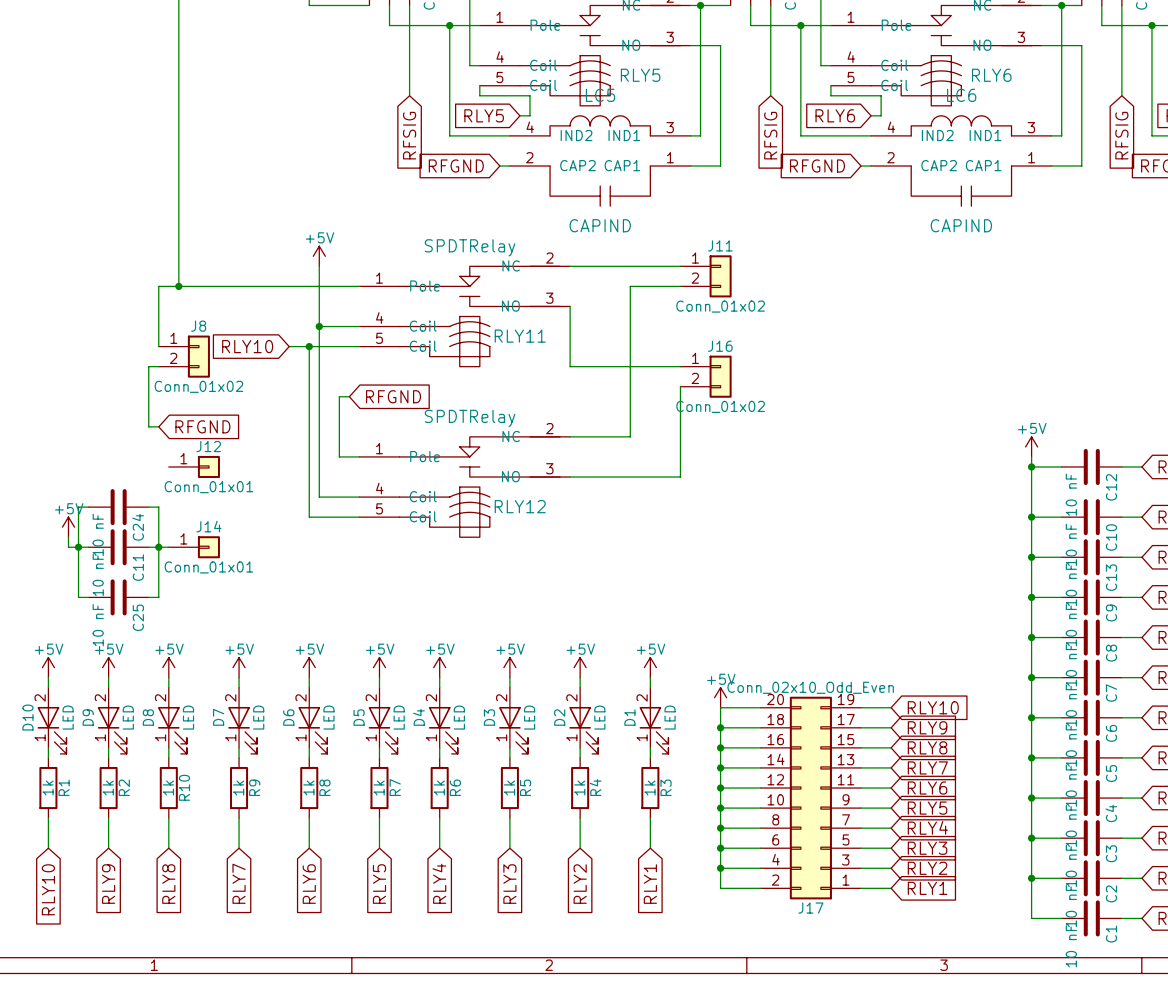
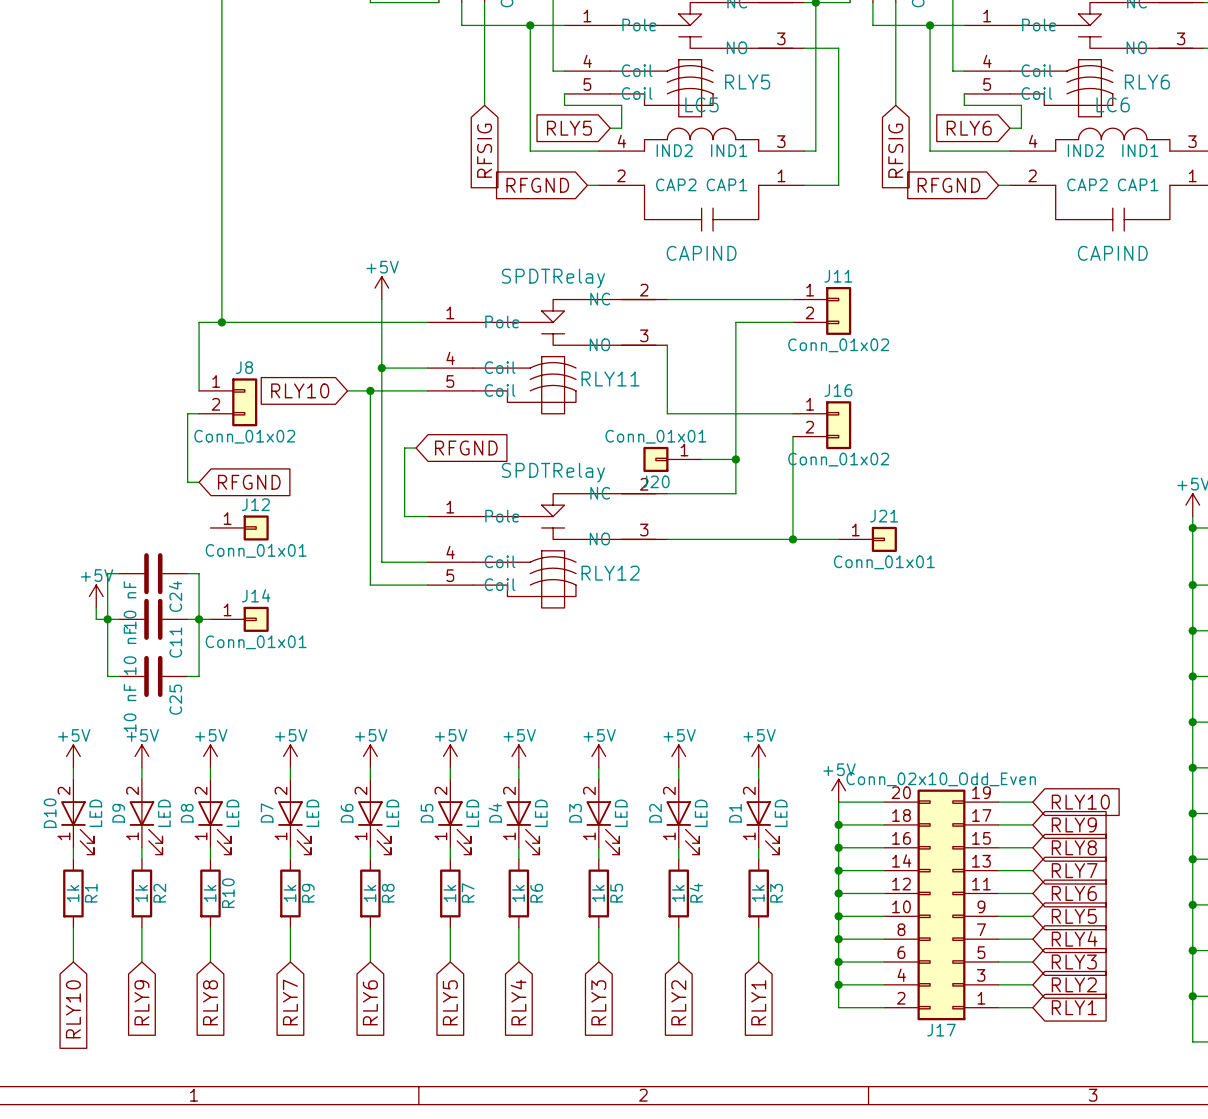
J20: none -> Conn_01x01 (672, 459)
wire: none -> (701, 459) (735, 459)
junction: none -> (735, 459)
wire: none -> (792, 539) (838, 539)
junction: none -> (792, 539)
J21: none -> Conn_01x01 (867, 539)

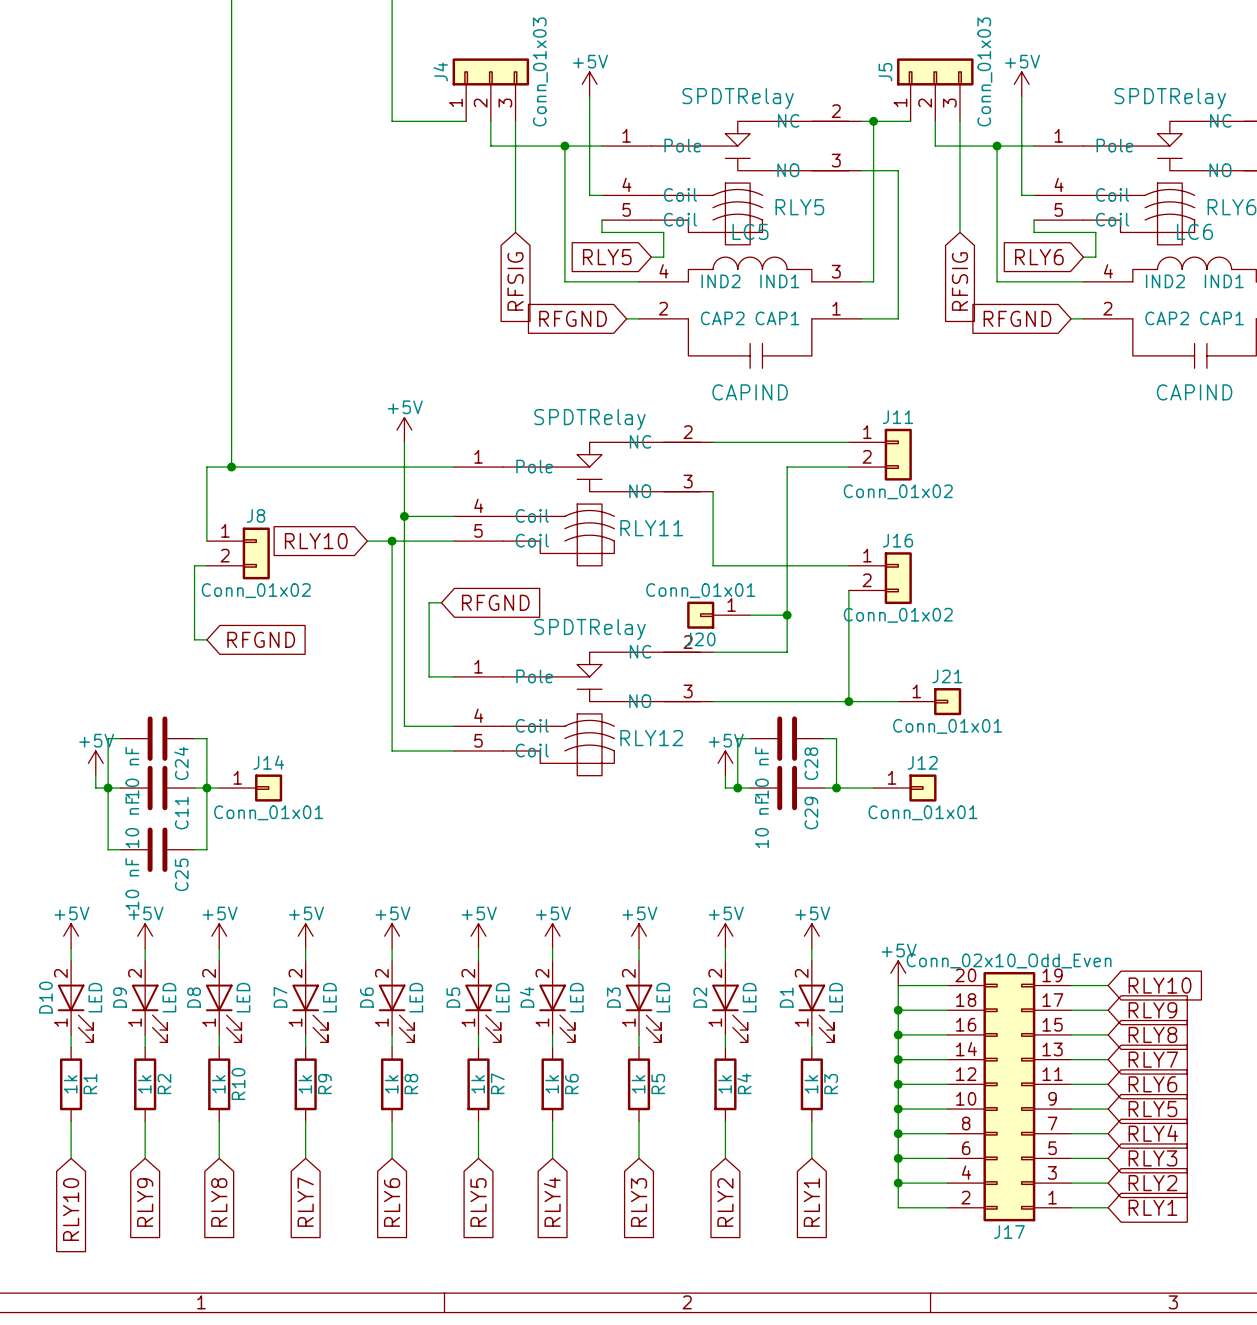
J12 position: (239, 527) -> (905, 788)
wire: none -> (750, 738) (737, 738) (737, 788)
C28: none -> 10 nF (787, 738)
wire: none -> (824, 738) (836, 738) (836, 788)
power symbol: none -> +5V (725, 763)
wire: none -> (725, 775) (725, 788) (750, 788)
junction: none -> (737, 788)
C29: none -> 10 nF (787, 788)
wire: none -> (824, 788) (873, 788)
junction: none -> (836, 788)

